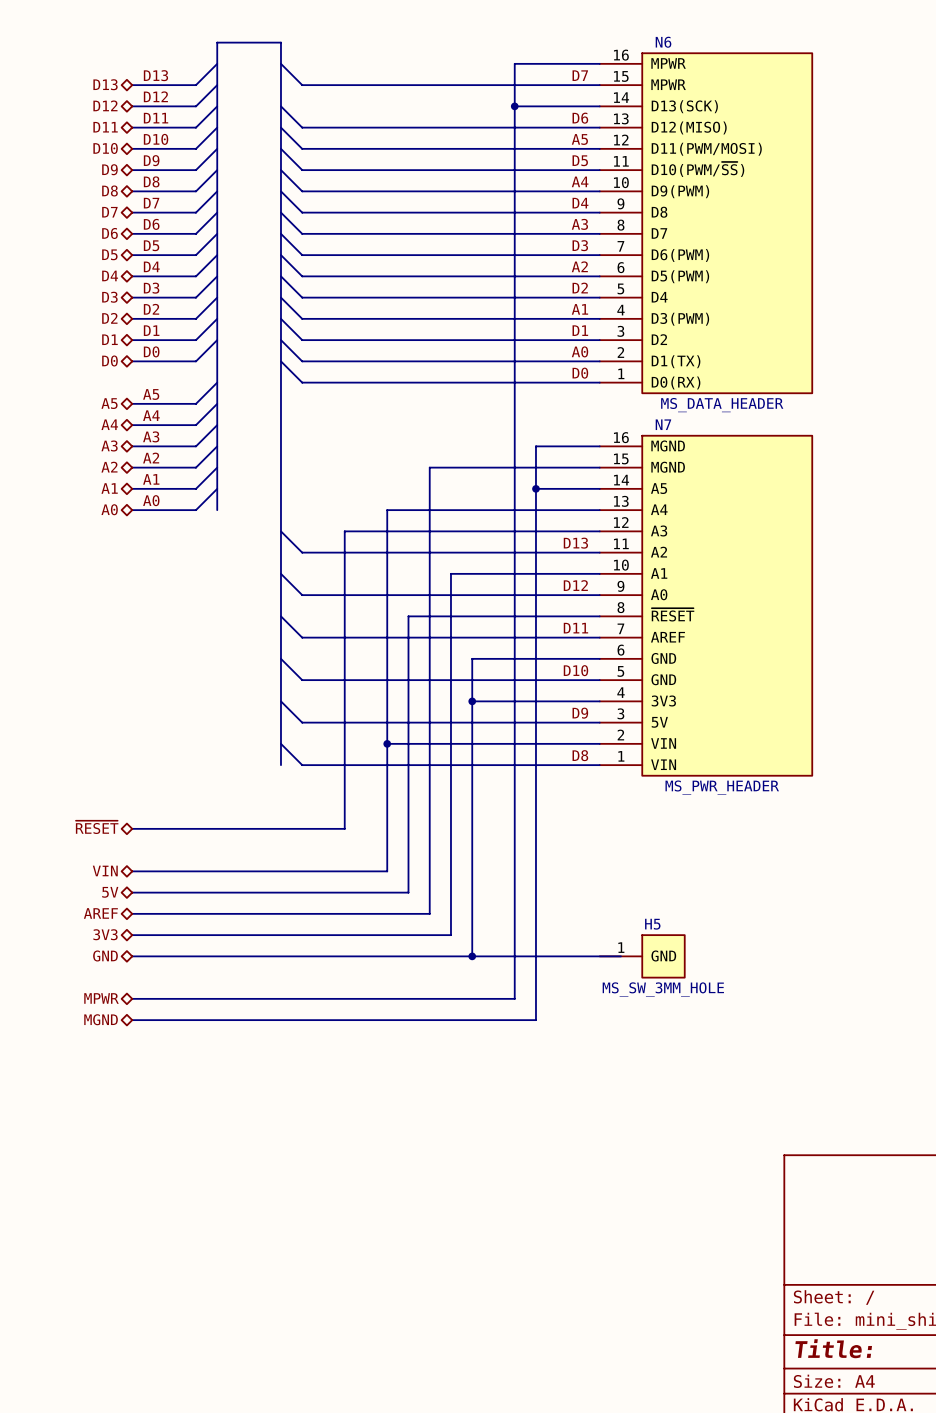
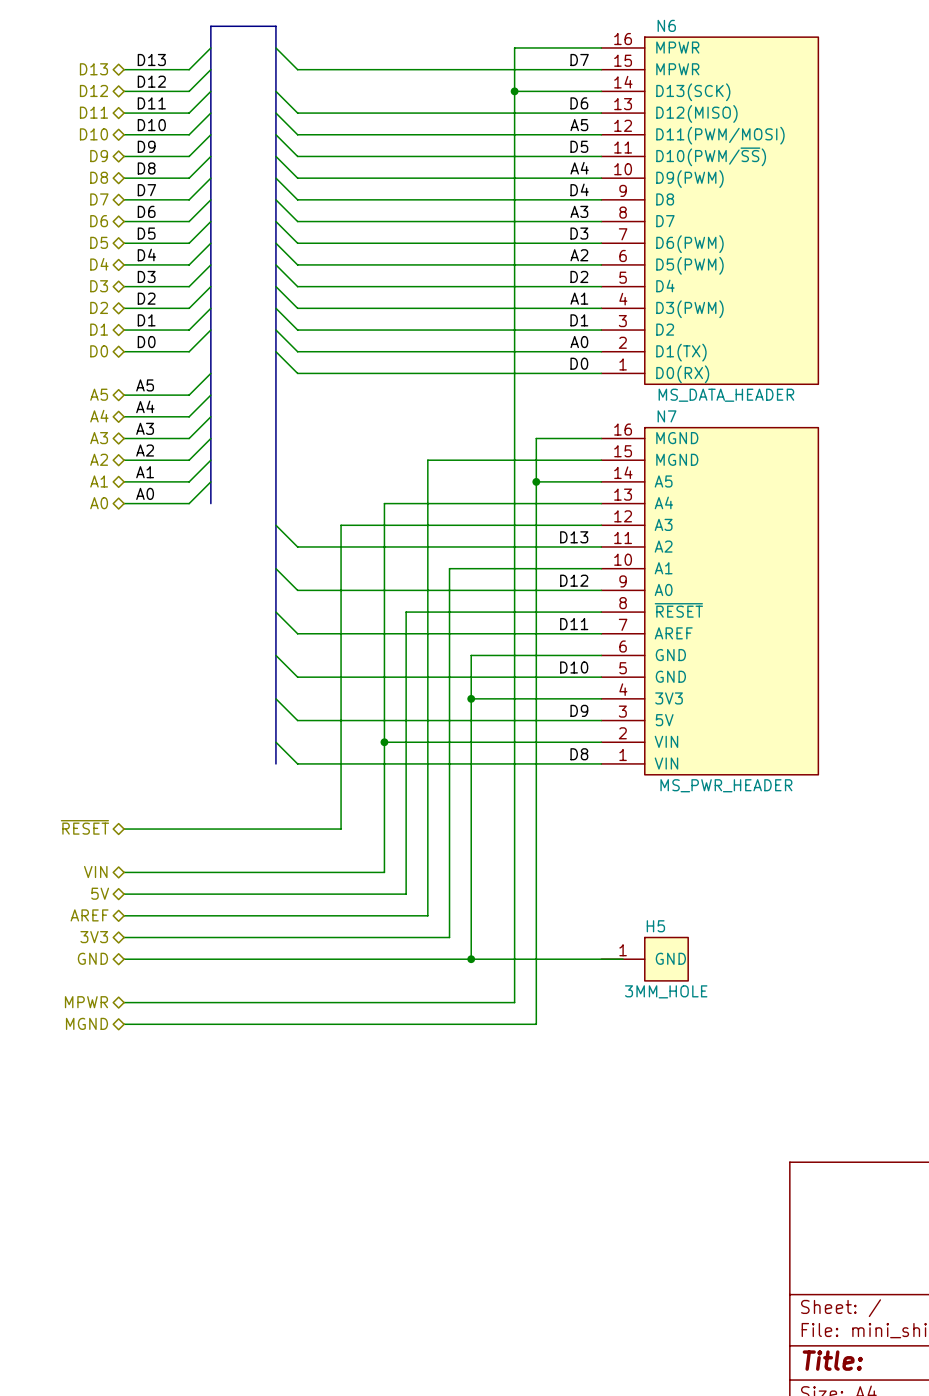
H5 value: MS_SW_3MM_HOLE (663, 989) -> 3MM_HOLE (666, 991)

